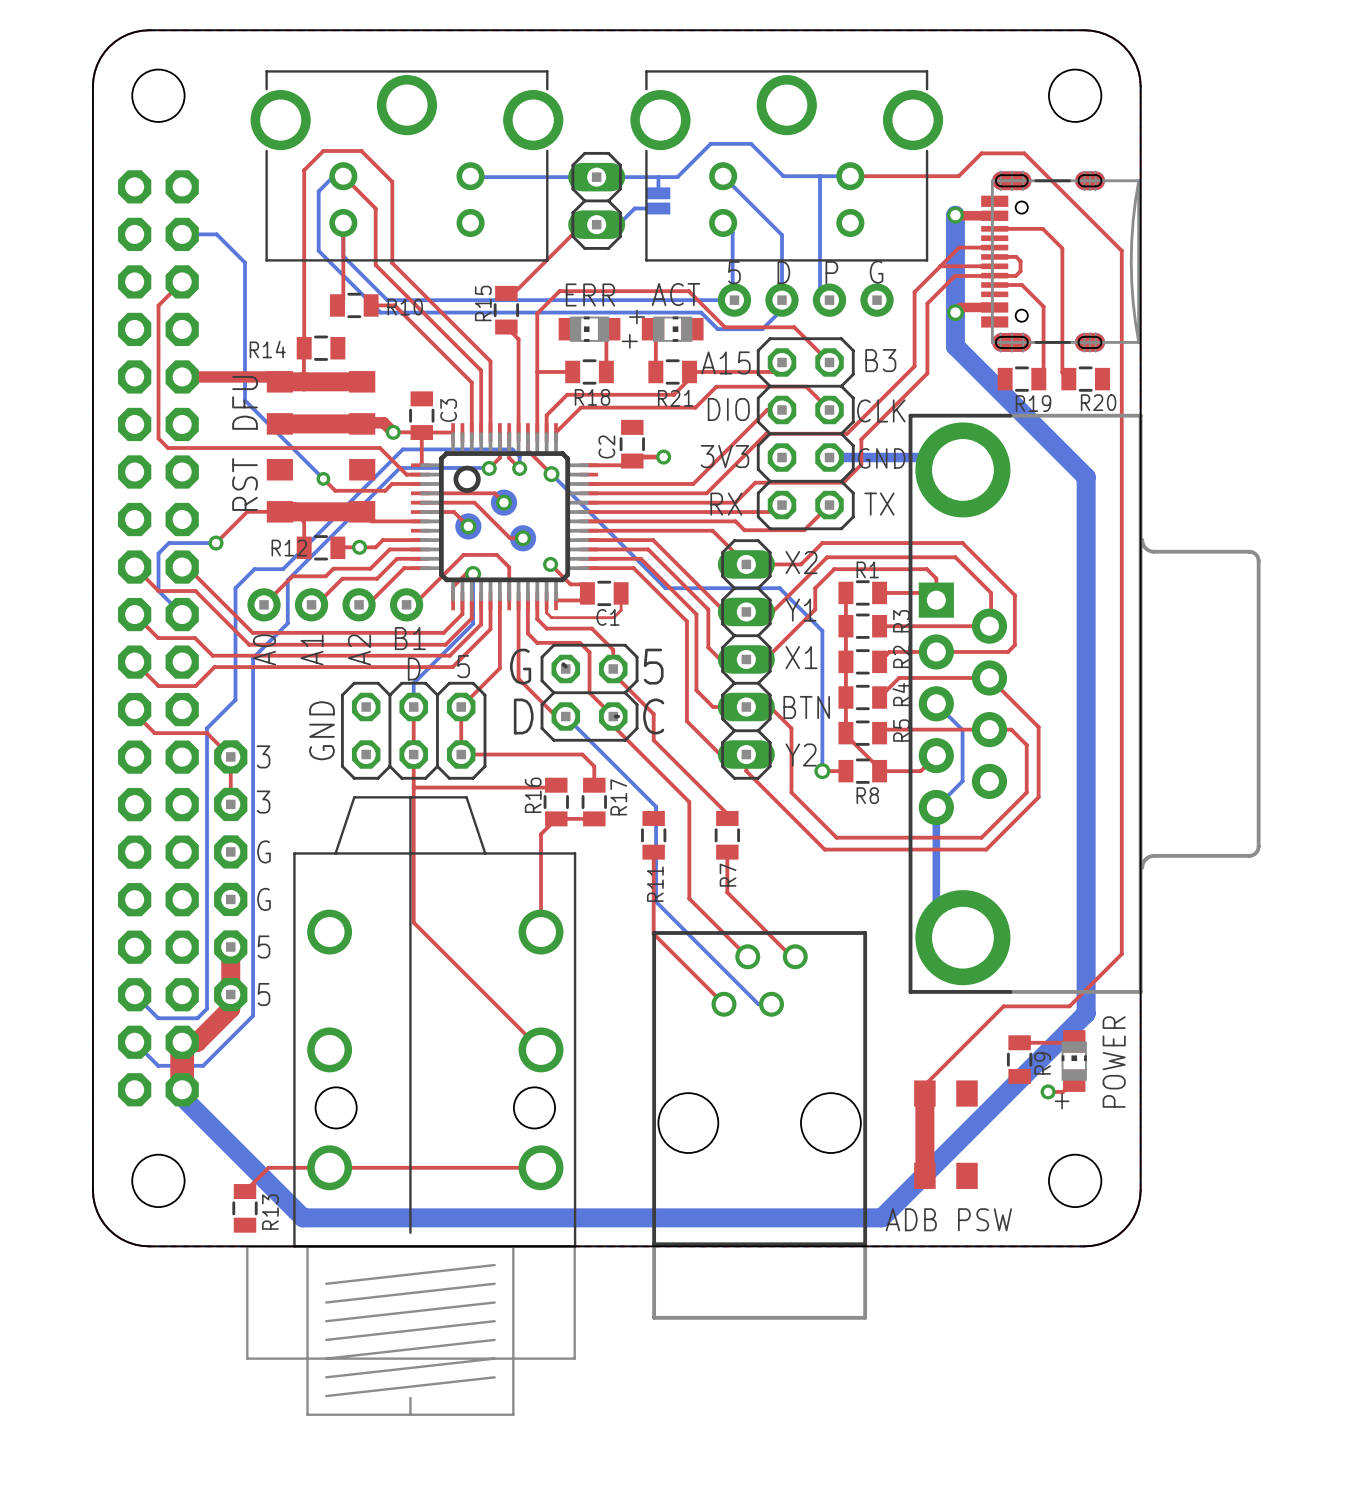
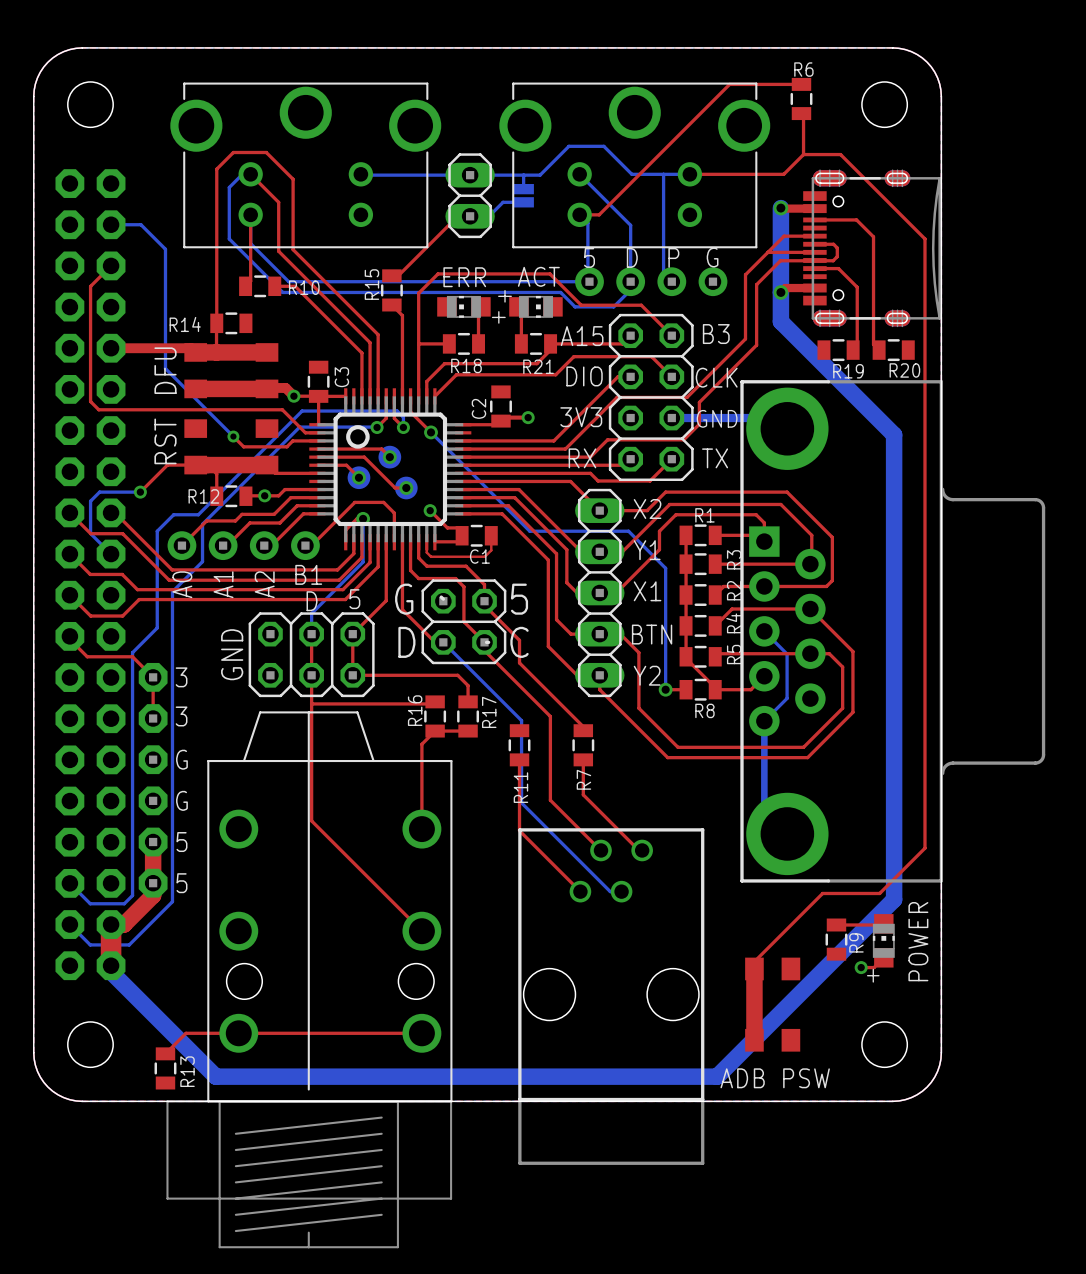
top track: none -> (801, 84) (729, 84) (599, 214) (579, 214)
R6: none -> (801, 98)
top track: none -> (801, 113) (803, 115) (803, 154)

